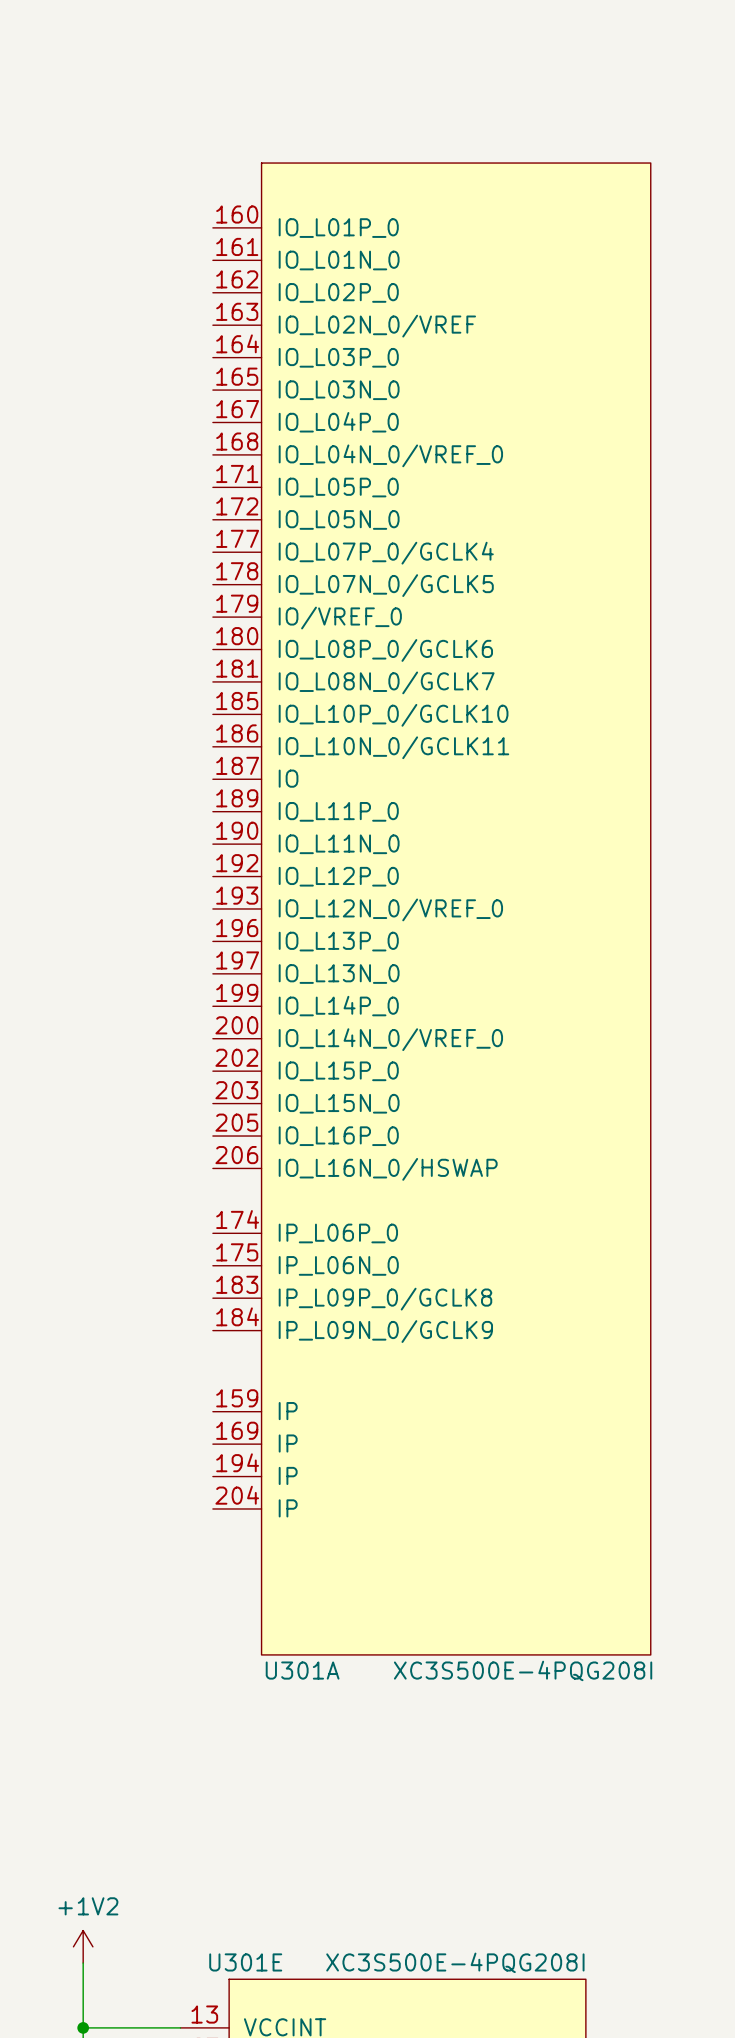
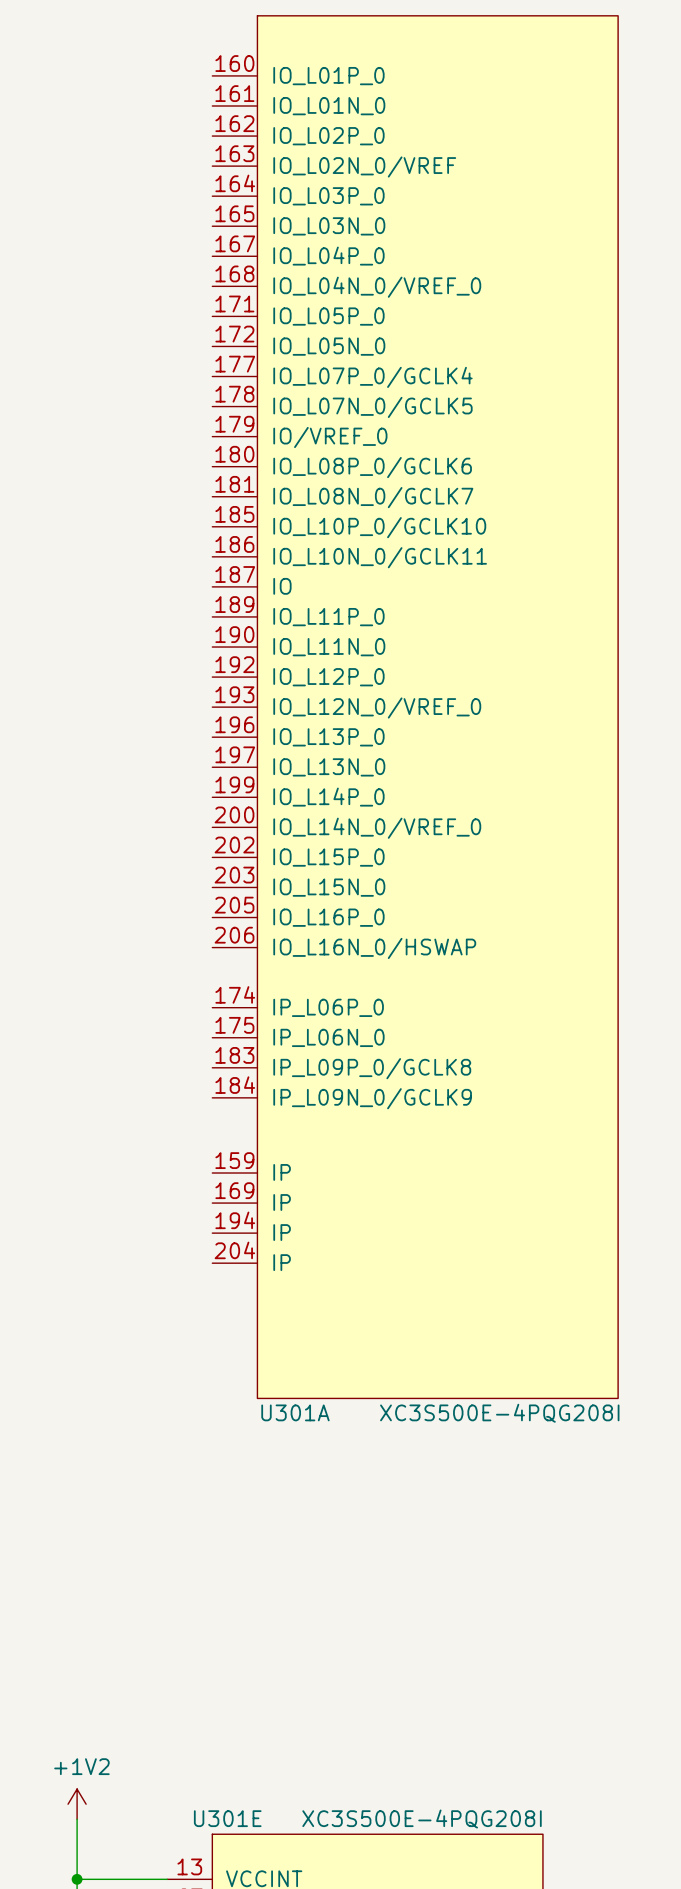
U301A position: (431, 908) -> (415, 707)

